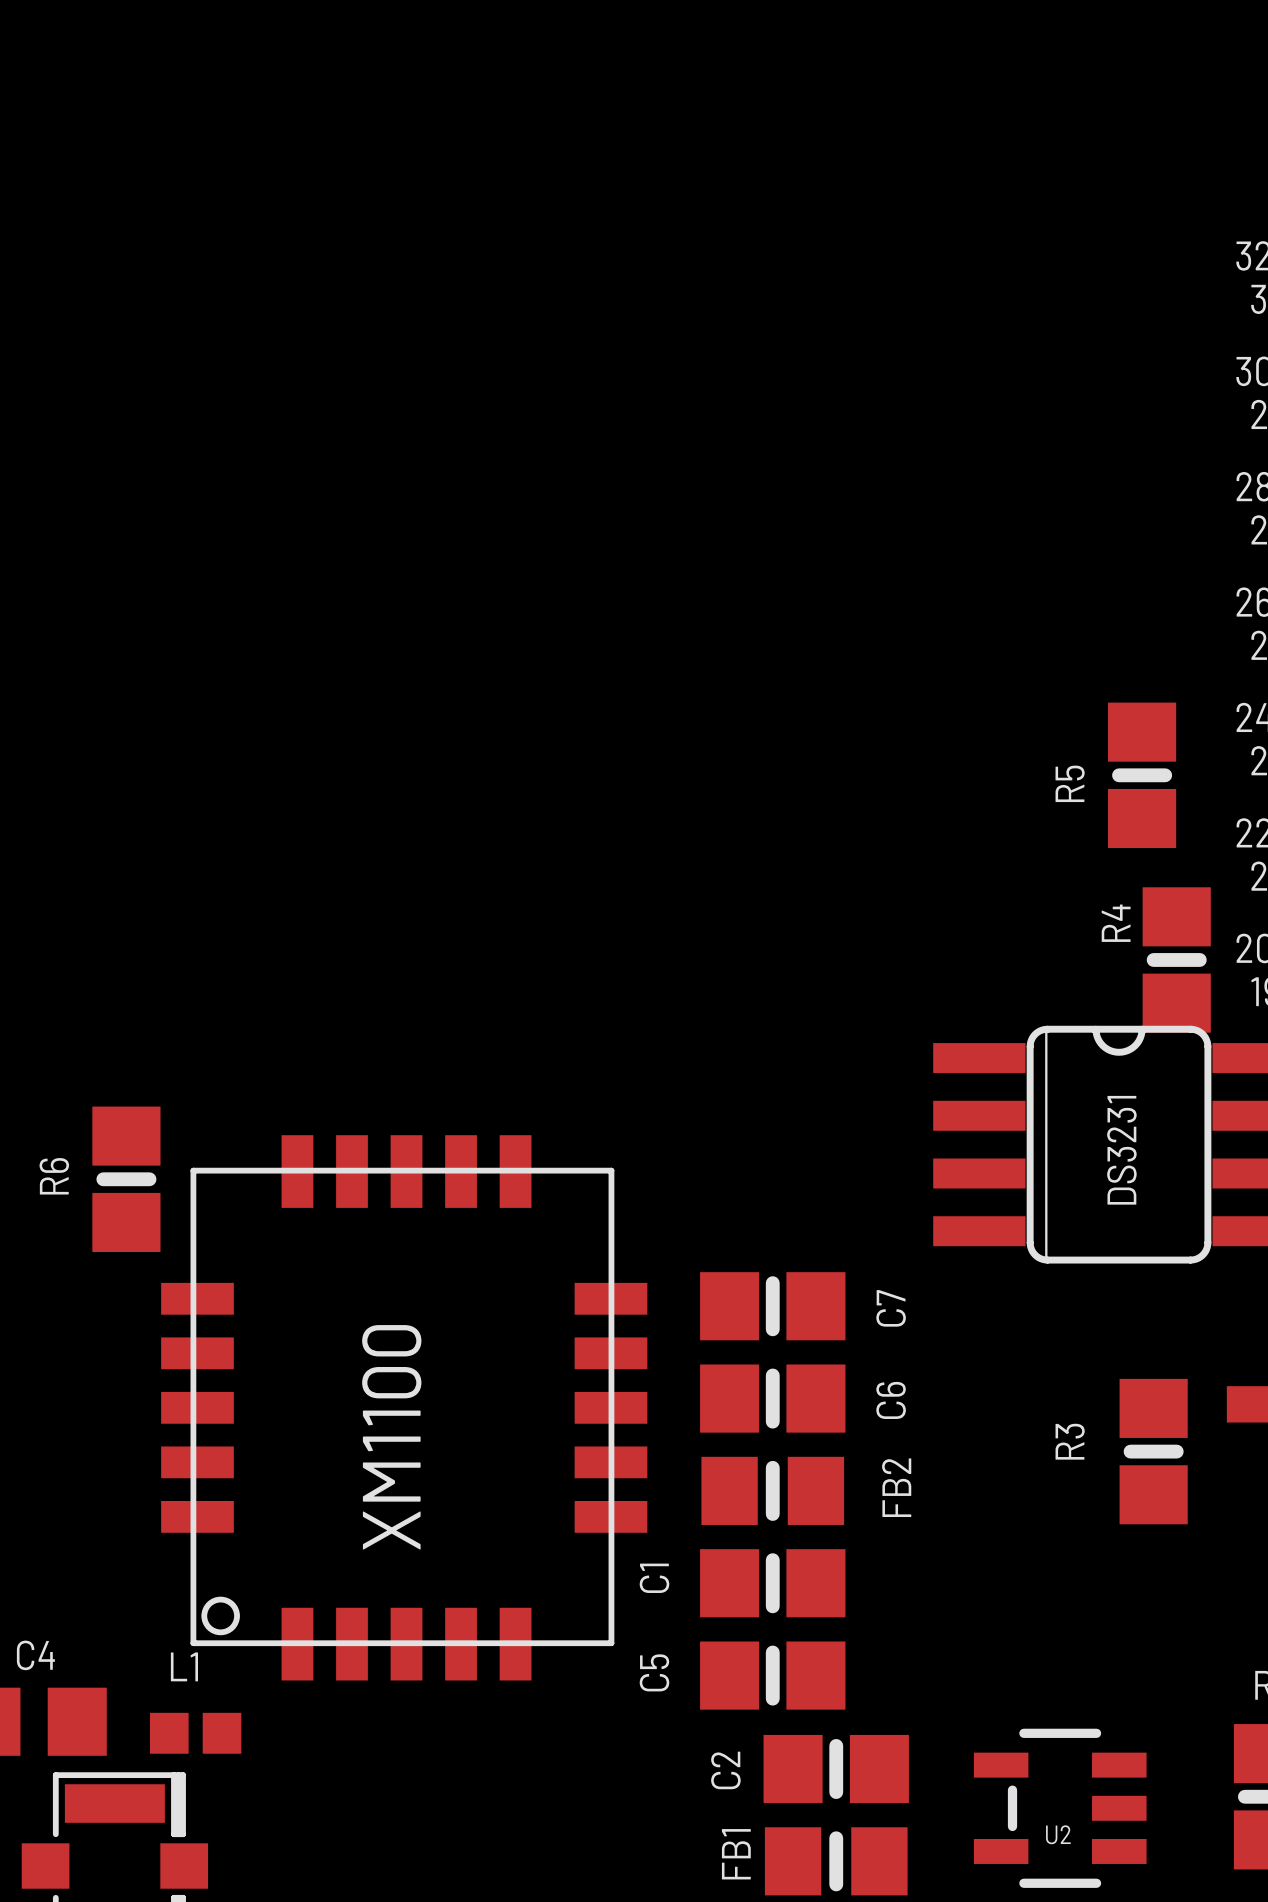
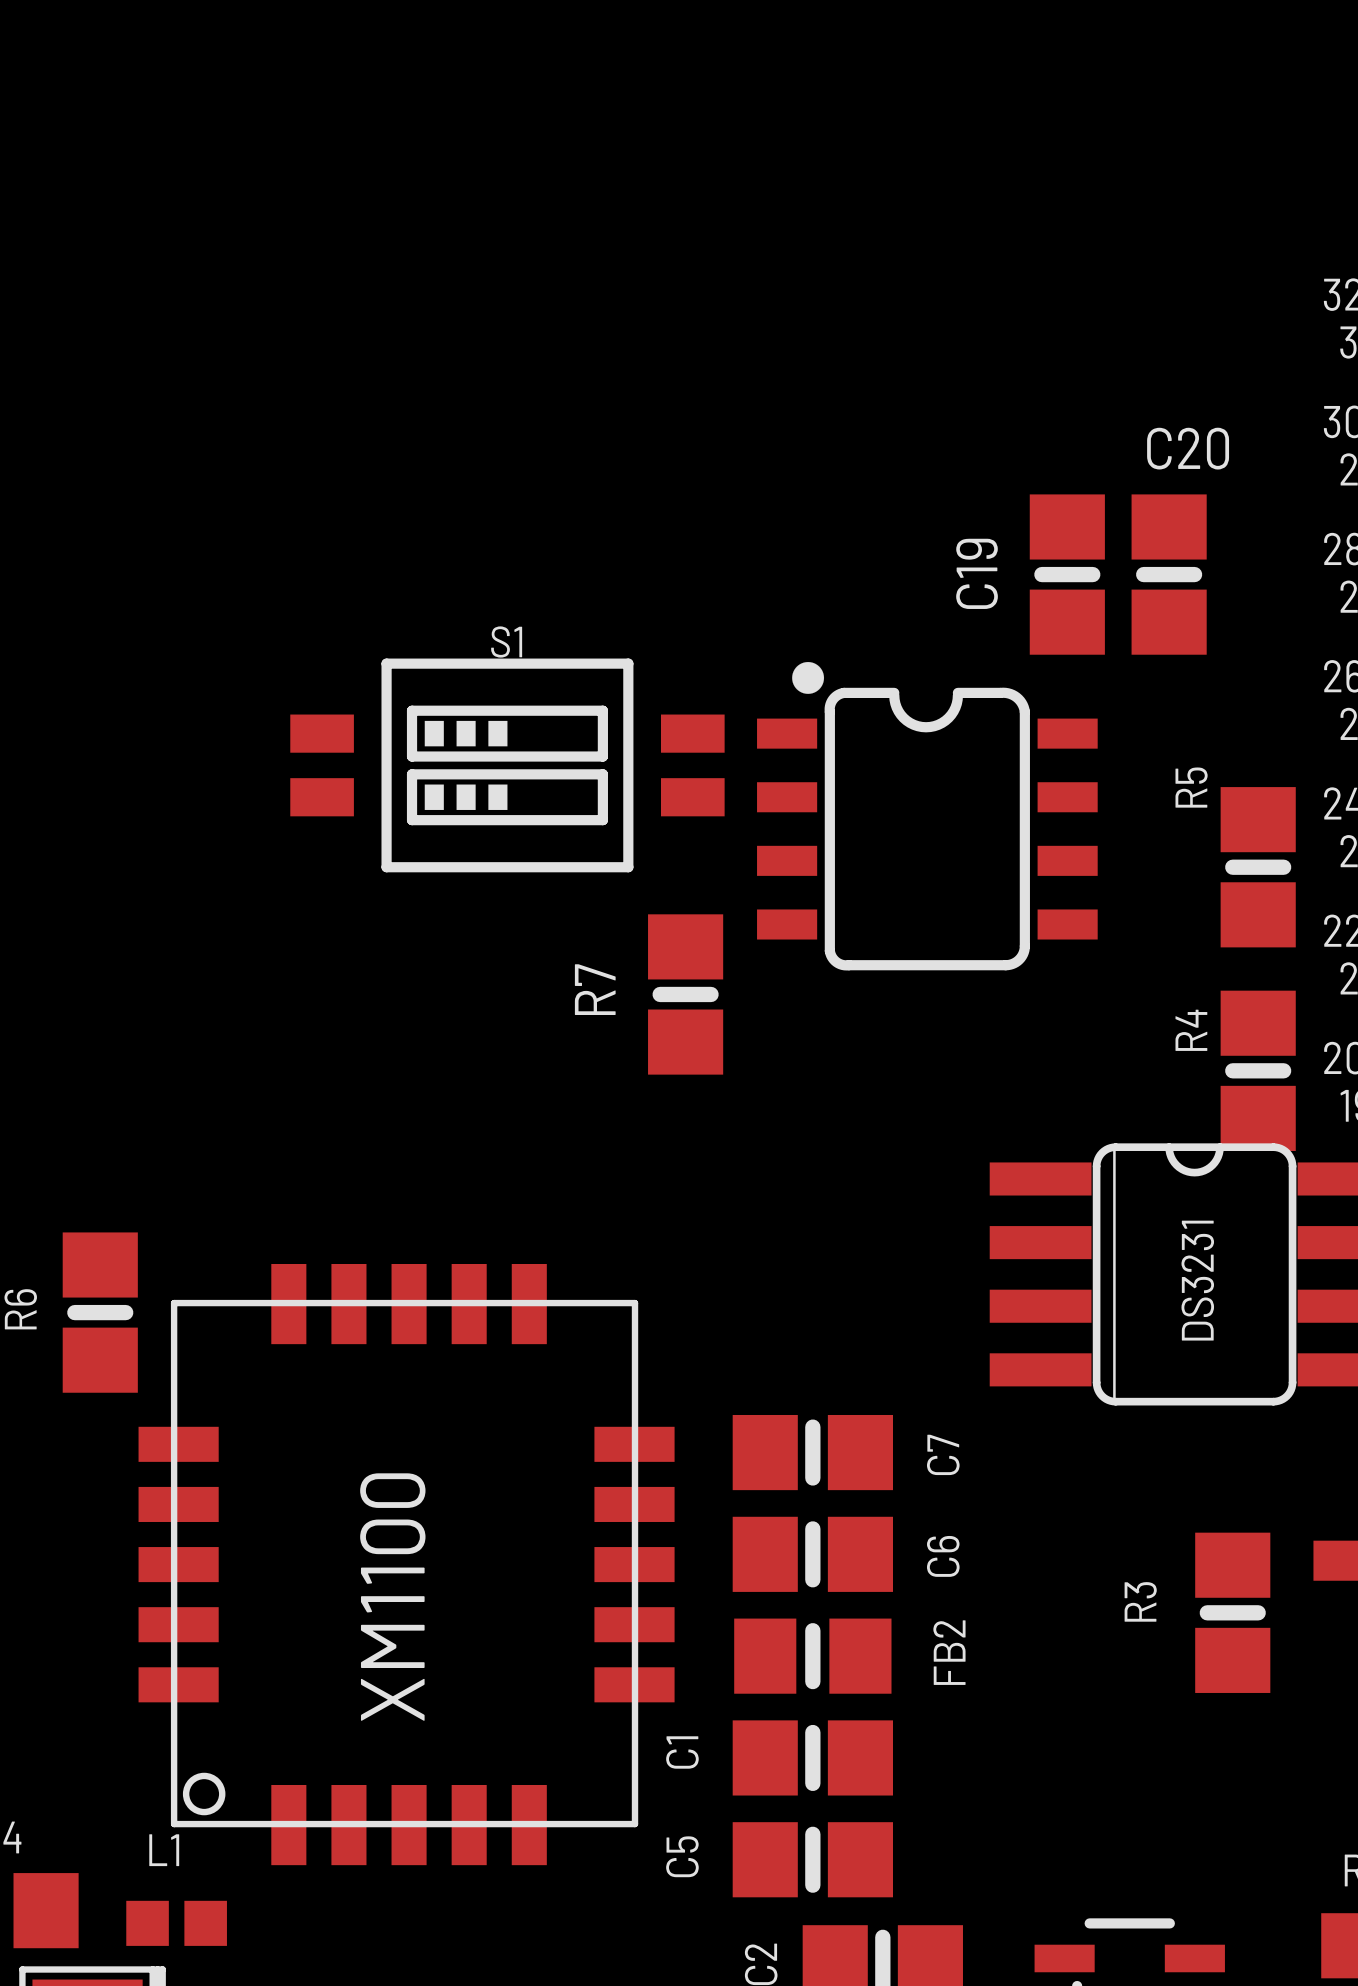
C19: none -> (1067, 574)
C20: none -> (1169, 574)
S1: none -> (507, 765)
part: none -> (927, 816)
R5 position: (1142, 775) -> (1258, 867)
R5 name position: R5 (1070, 783) -> R5 (1191, 787)
R7: none -> (685, 994)

